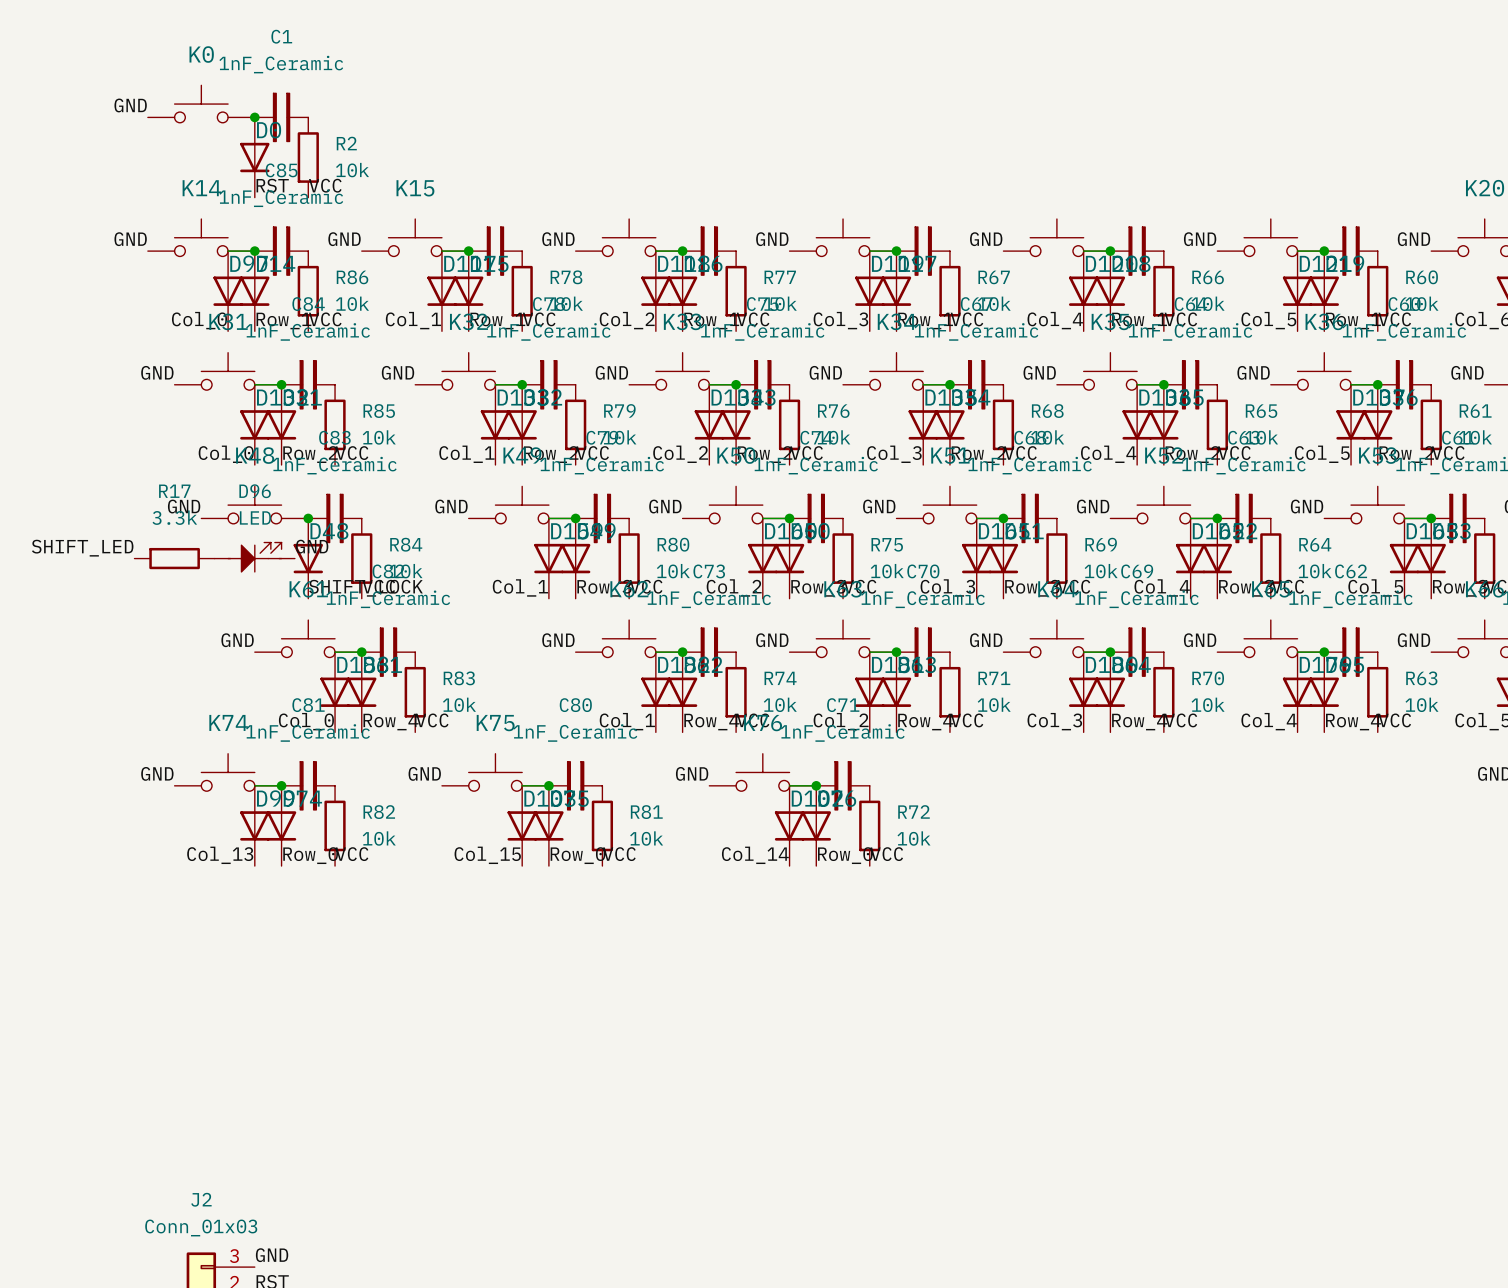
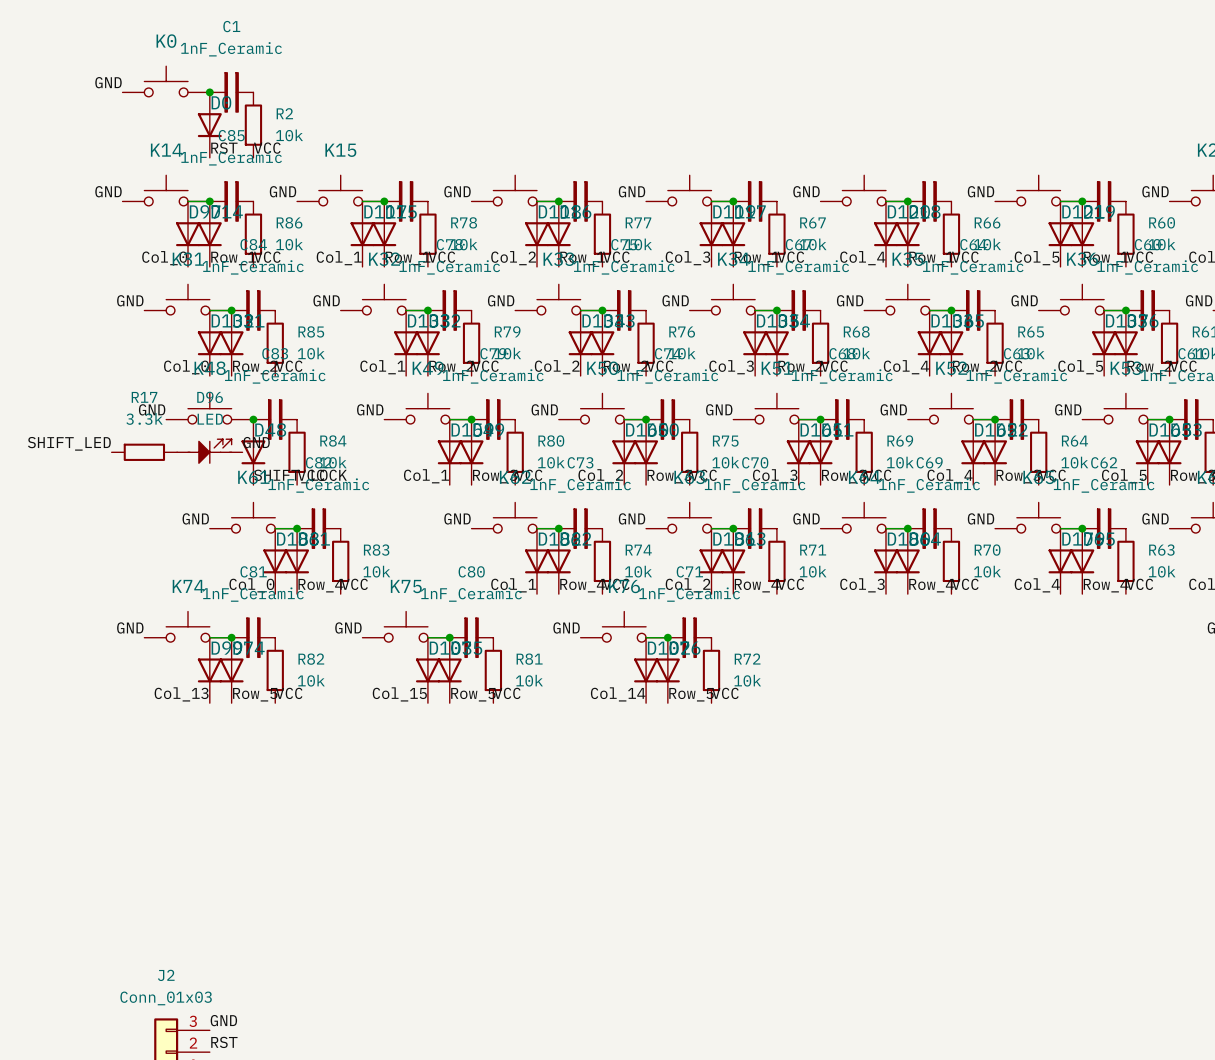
label: Row_0 (310, 855) -> Row_5 (255, 694)
label: Row_0 (577, 855) -> Row_5 (473, 694)
label: Row_0 (845, 855) -> Row_5 (691, 694)

